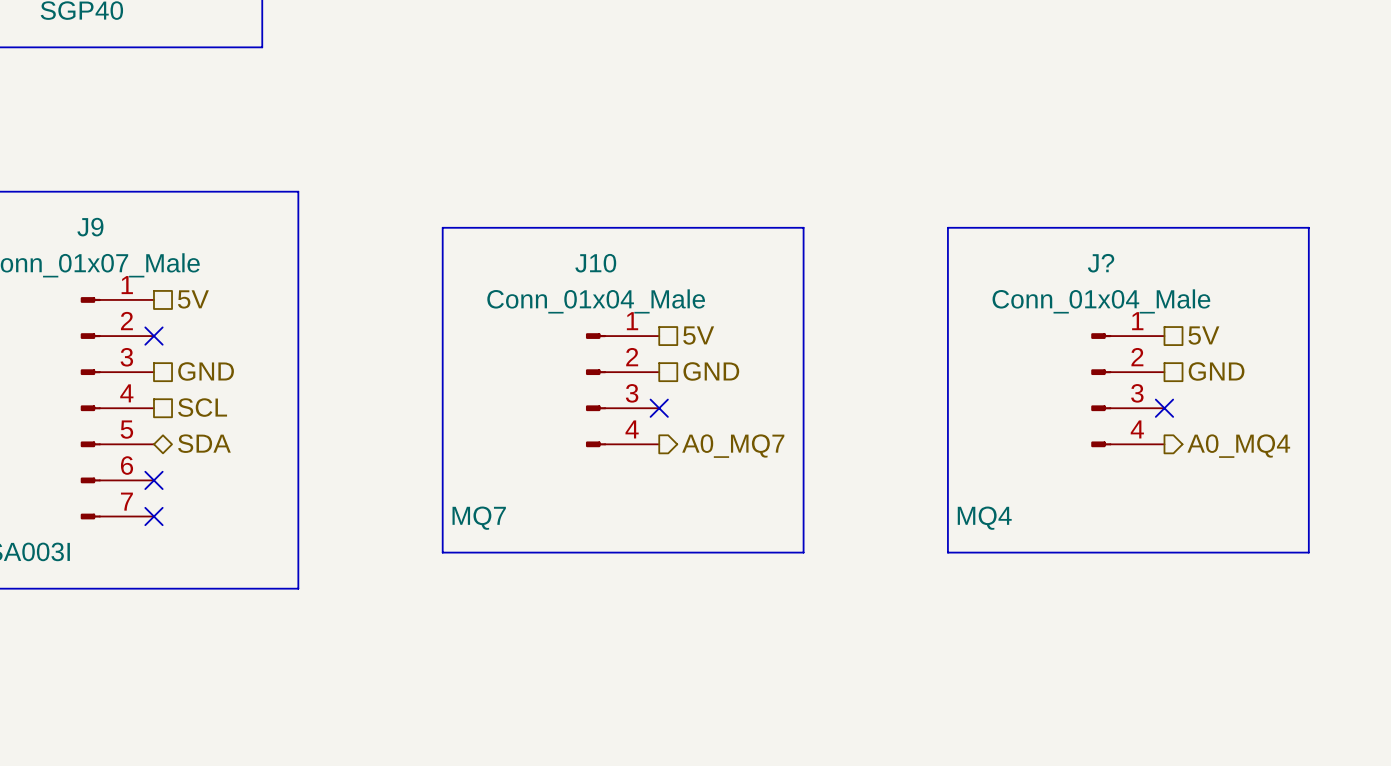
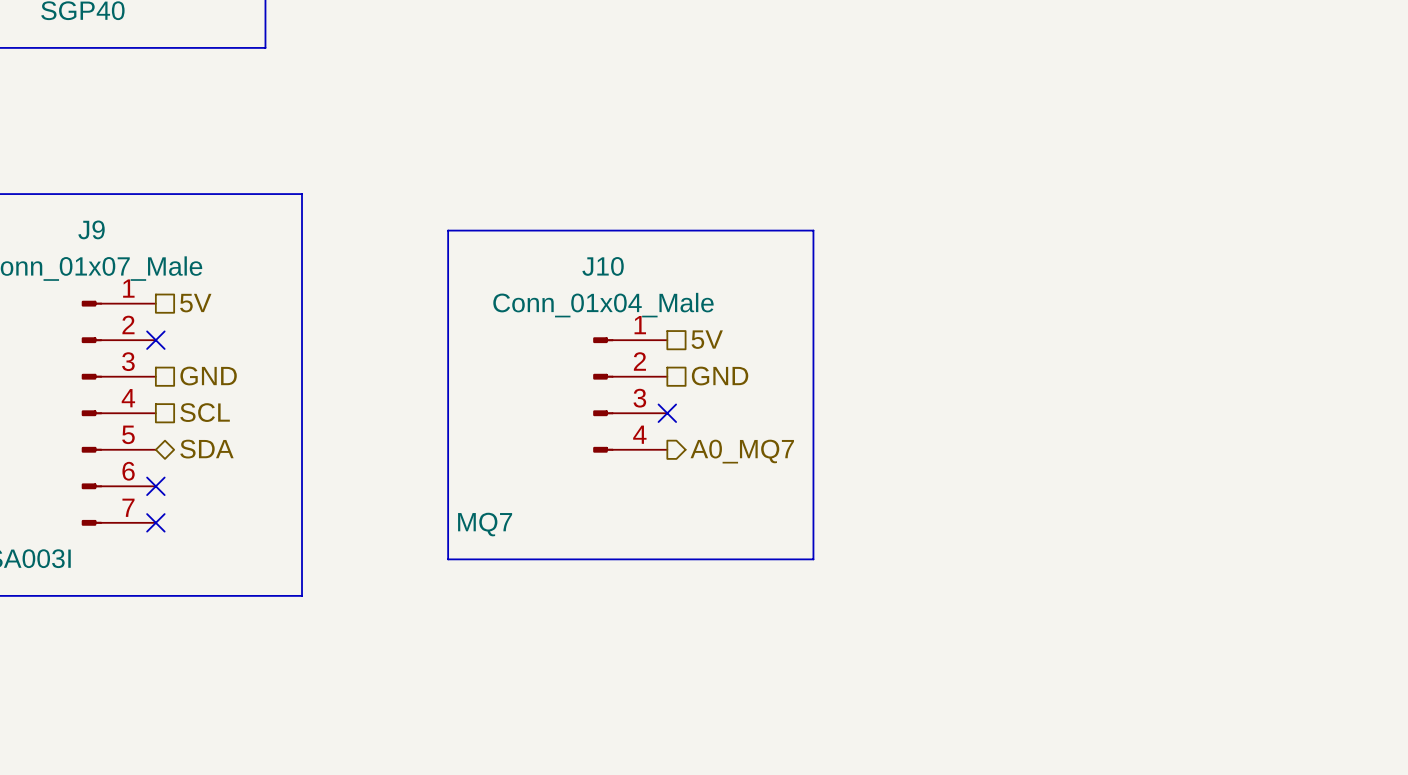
line: (947, 227) (947, 552) (1308, 552) (1308, 227) (947, 227) -> none
hierarchical label: 5V (1203, 335) -> none
hierarchical label: GND (1216, 371) -> none
J?: Conn_01x04_Male (1127, 390) -> none
no-connect mark: (1164, 408) -> none
hierarchical label: A0_MQ4 (1238, 446) -> none

